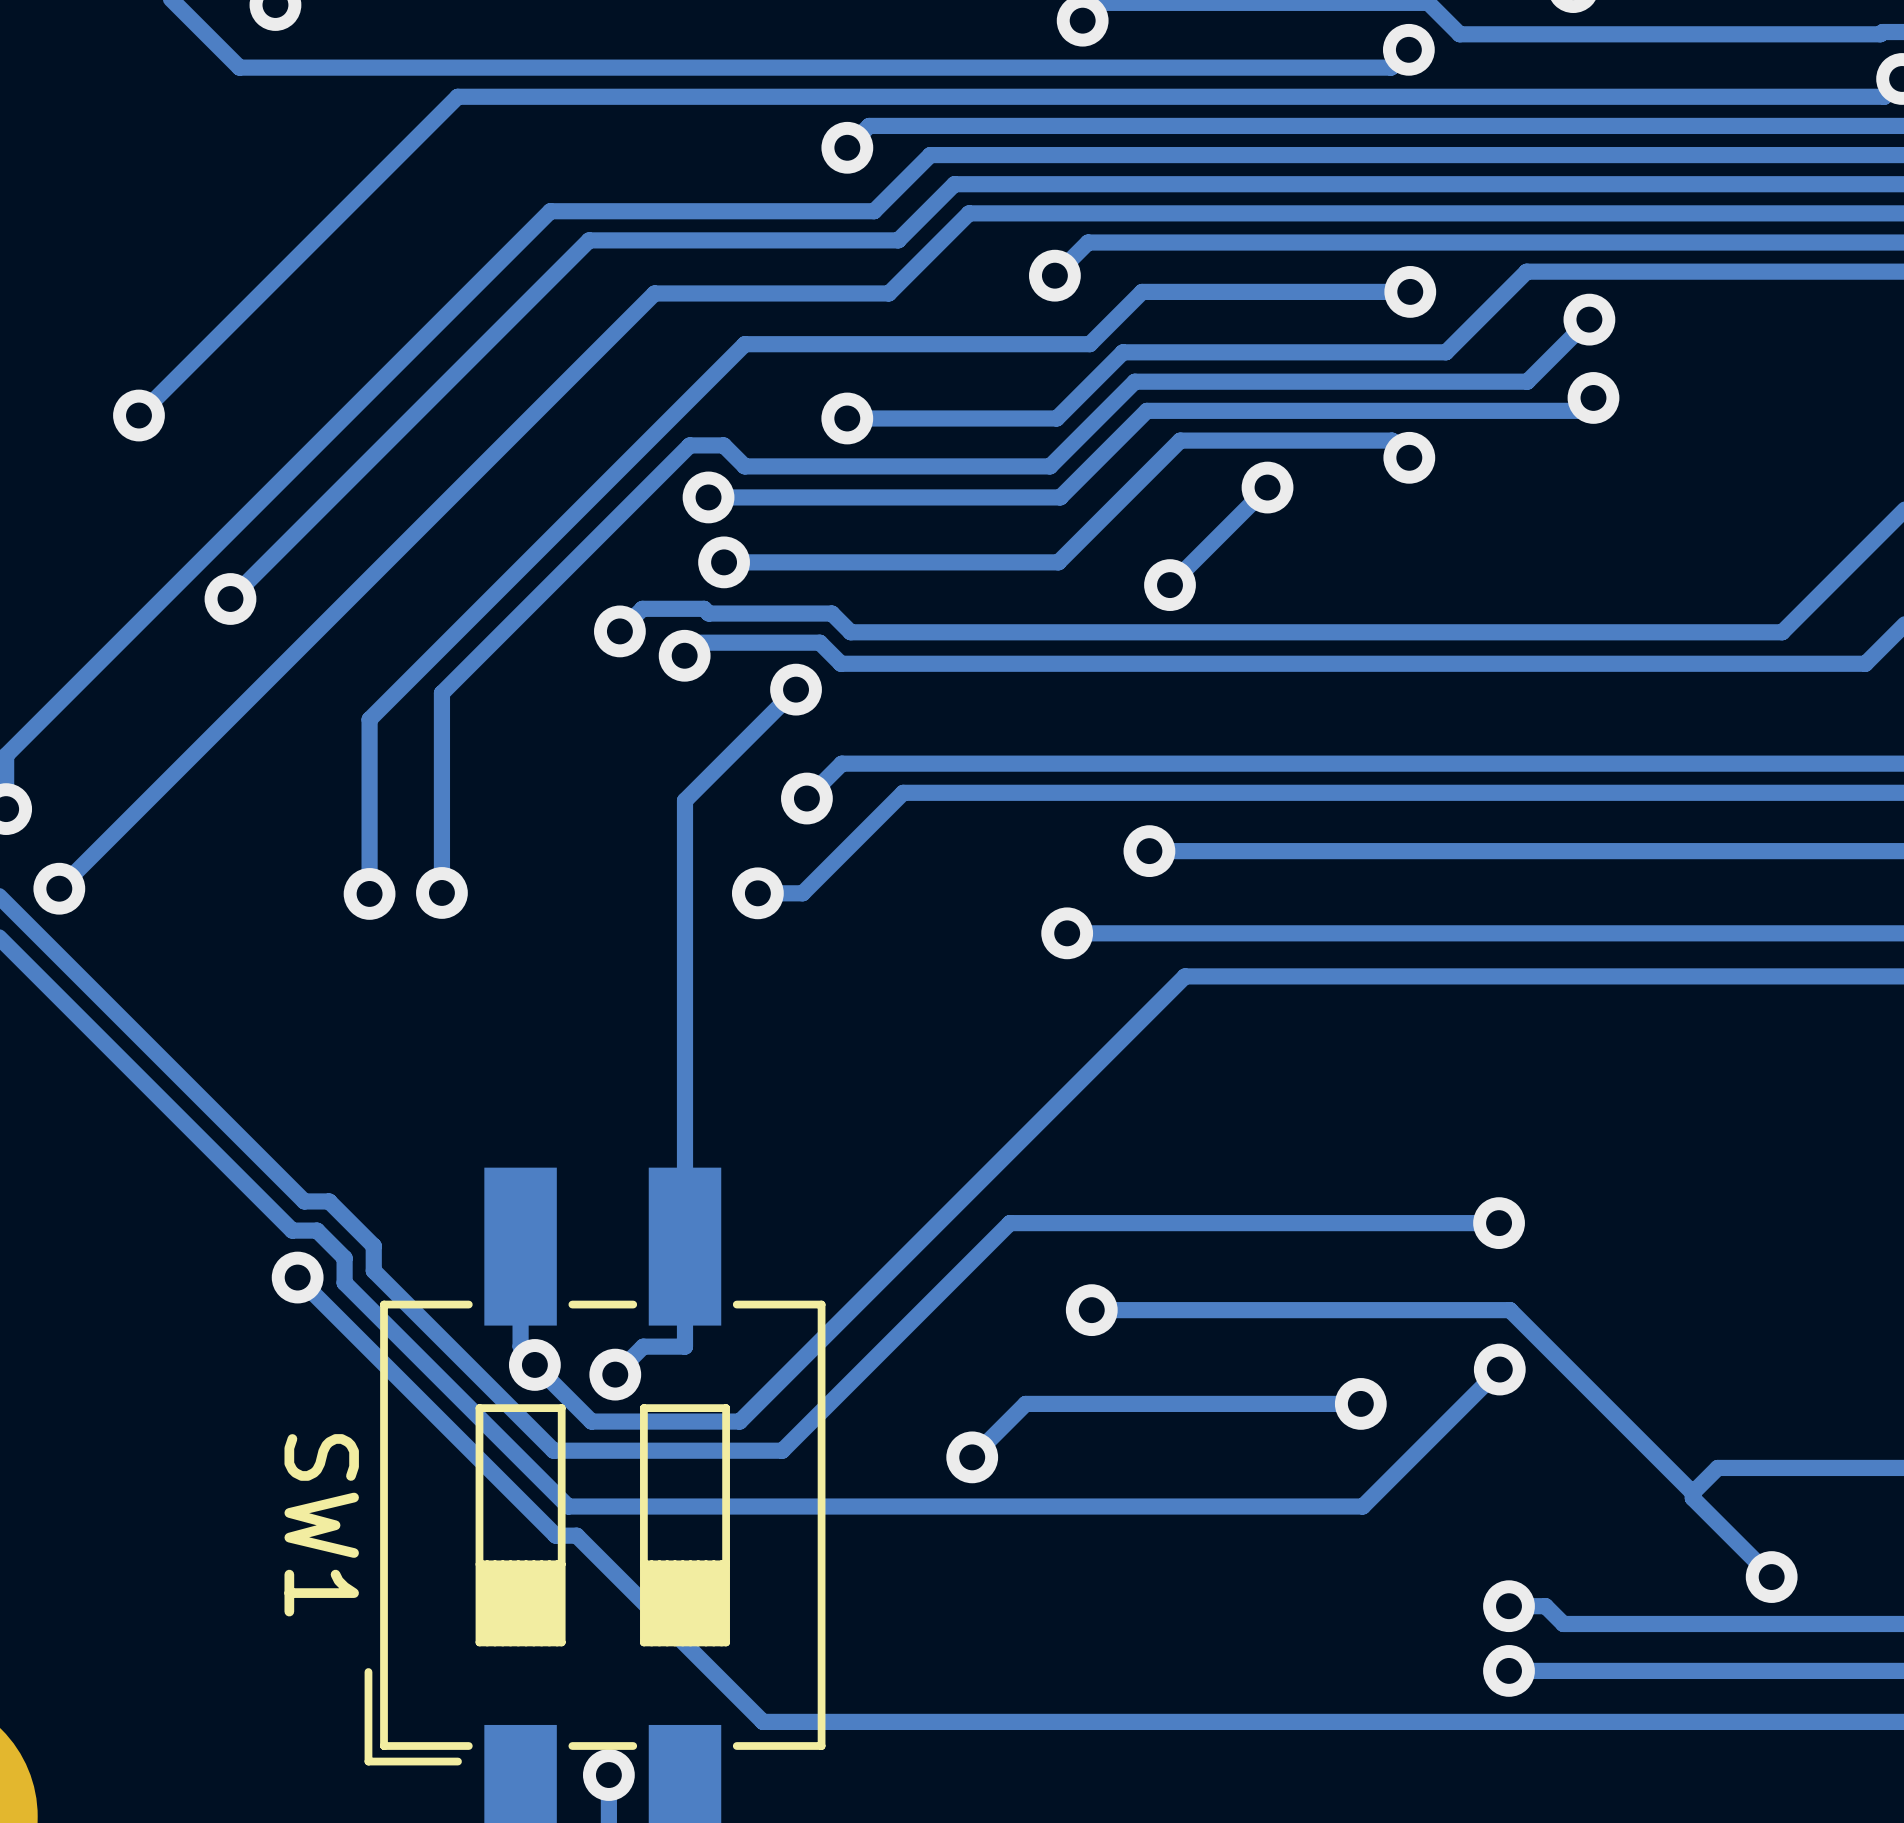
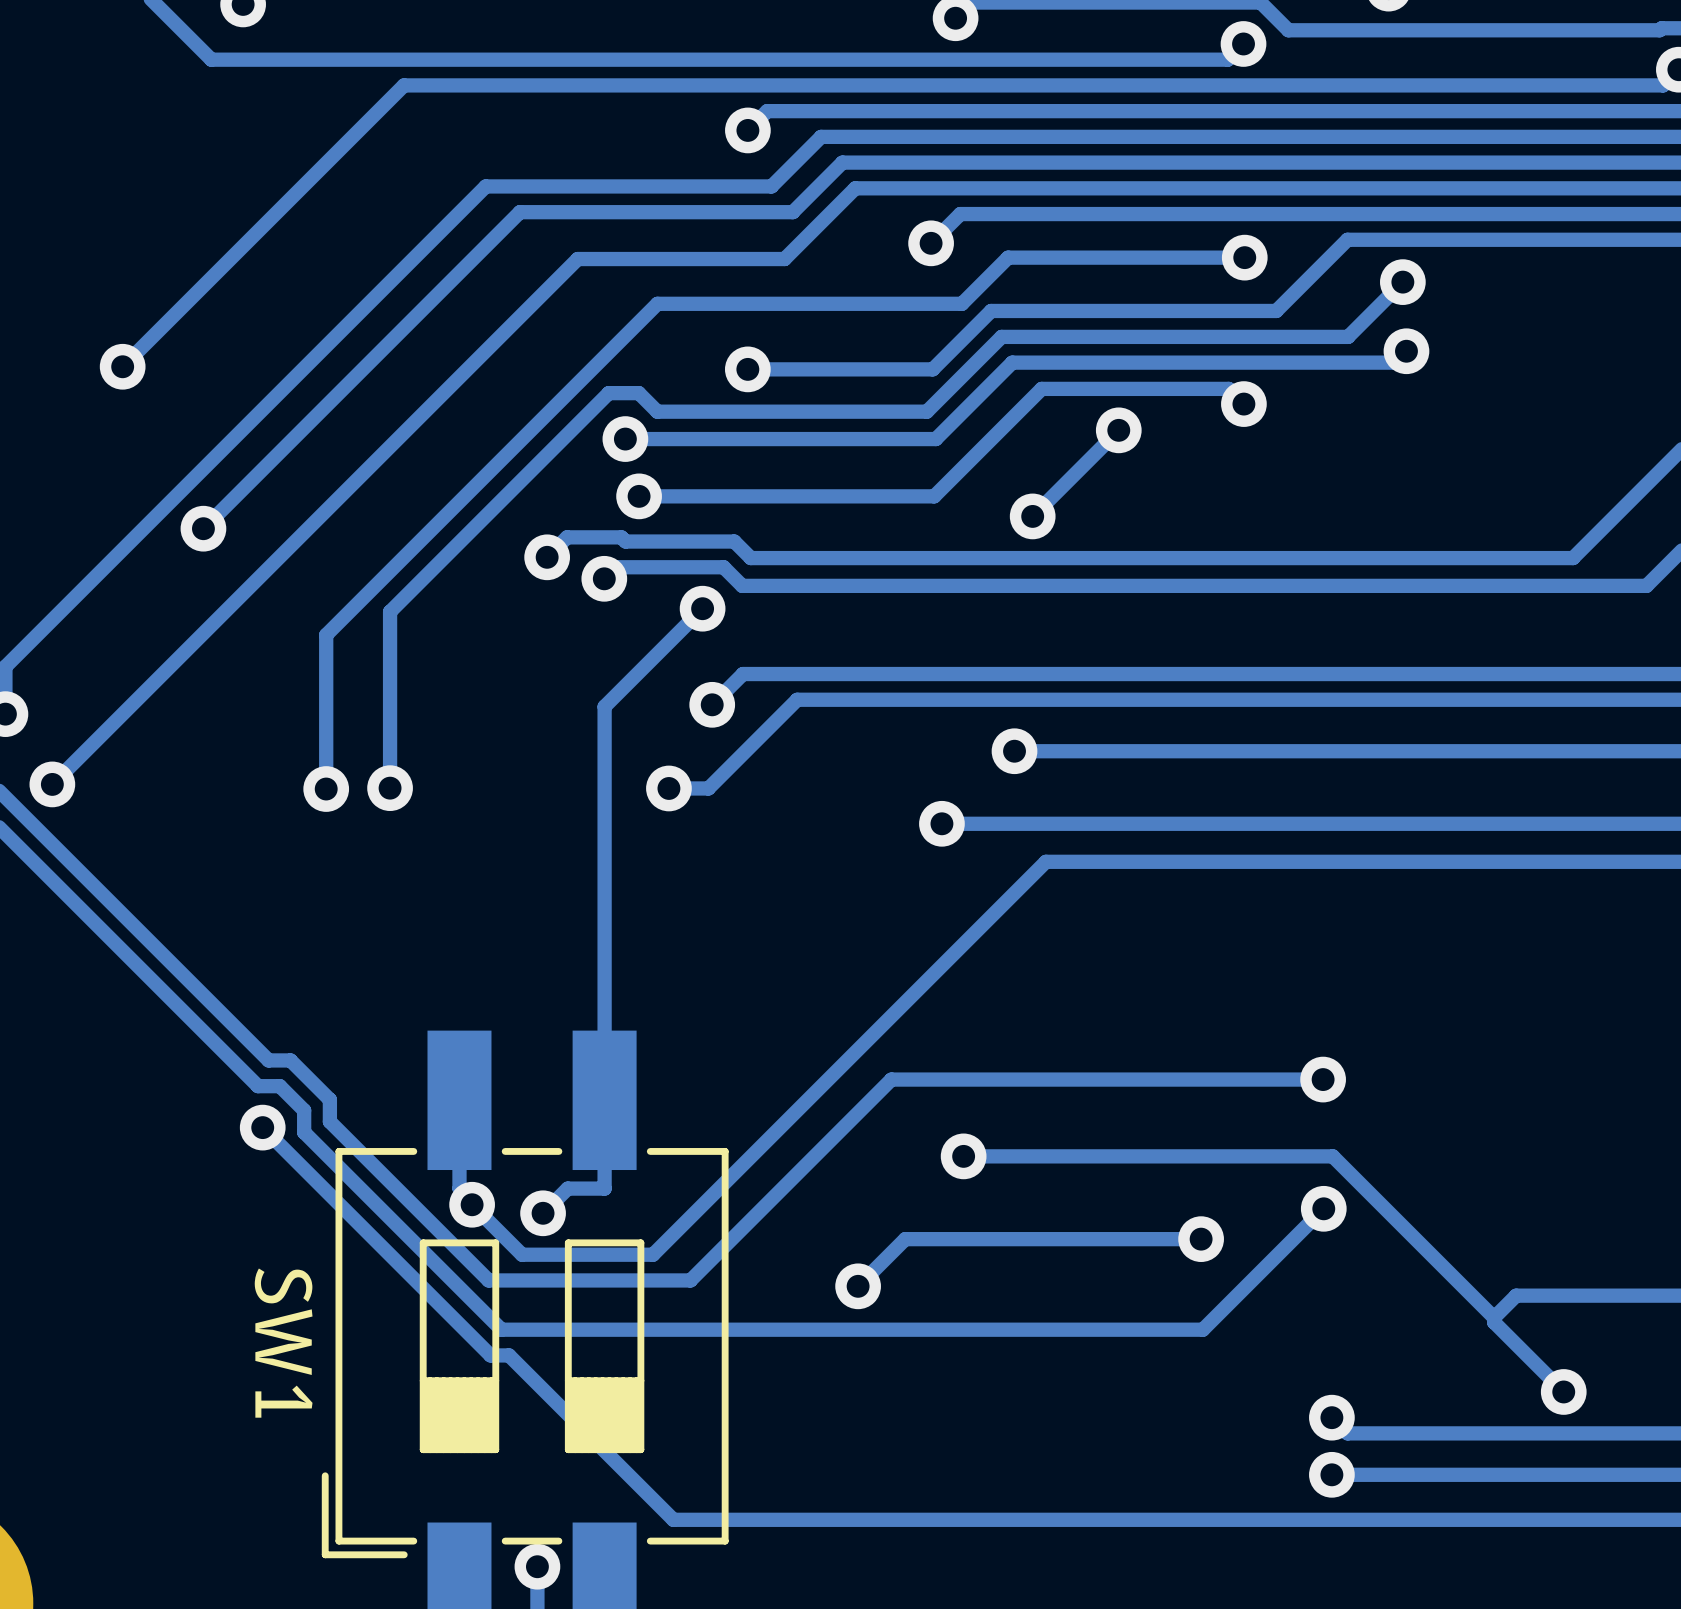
track: (1509, 1606) (1545, 1606) (1563, 1623) -> (1331, 1417) (1347, 1433) (1379, 1433)

